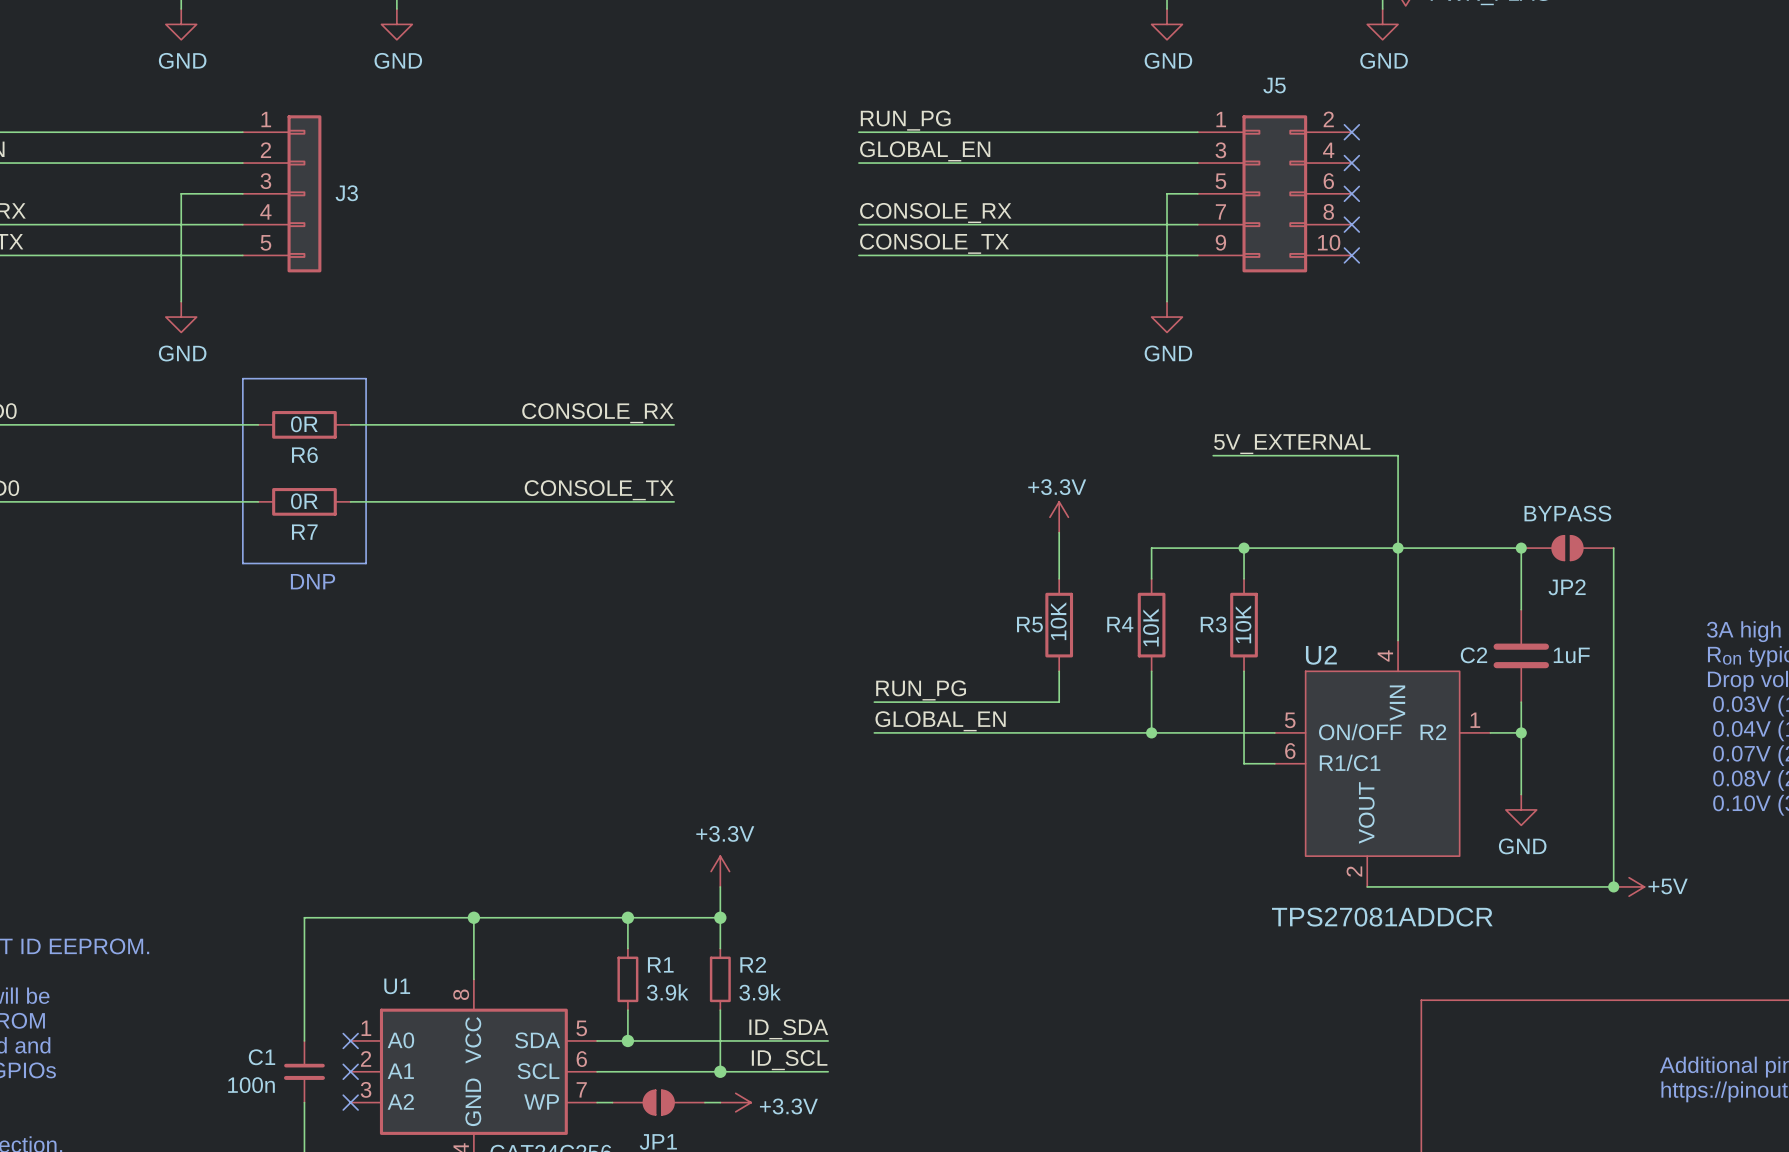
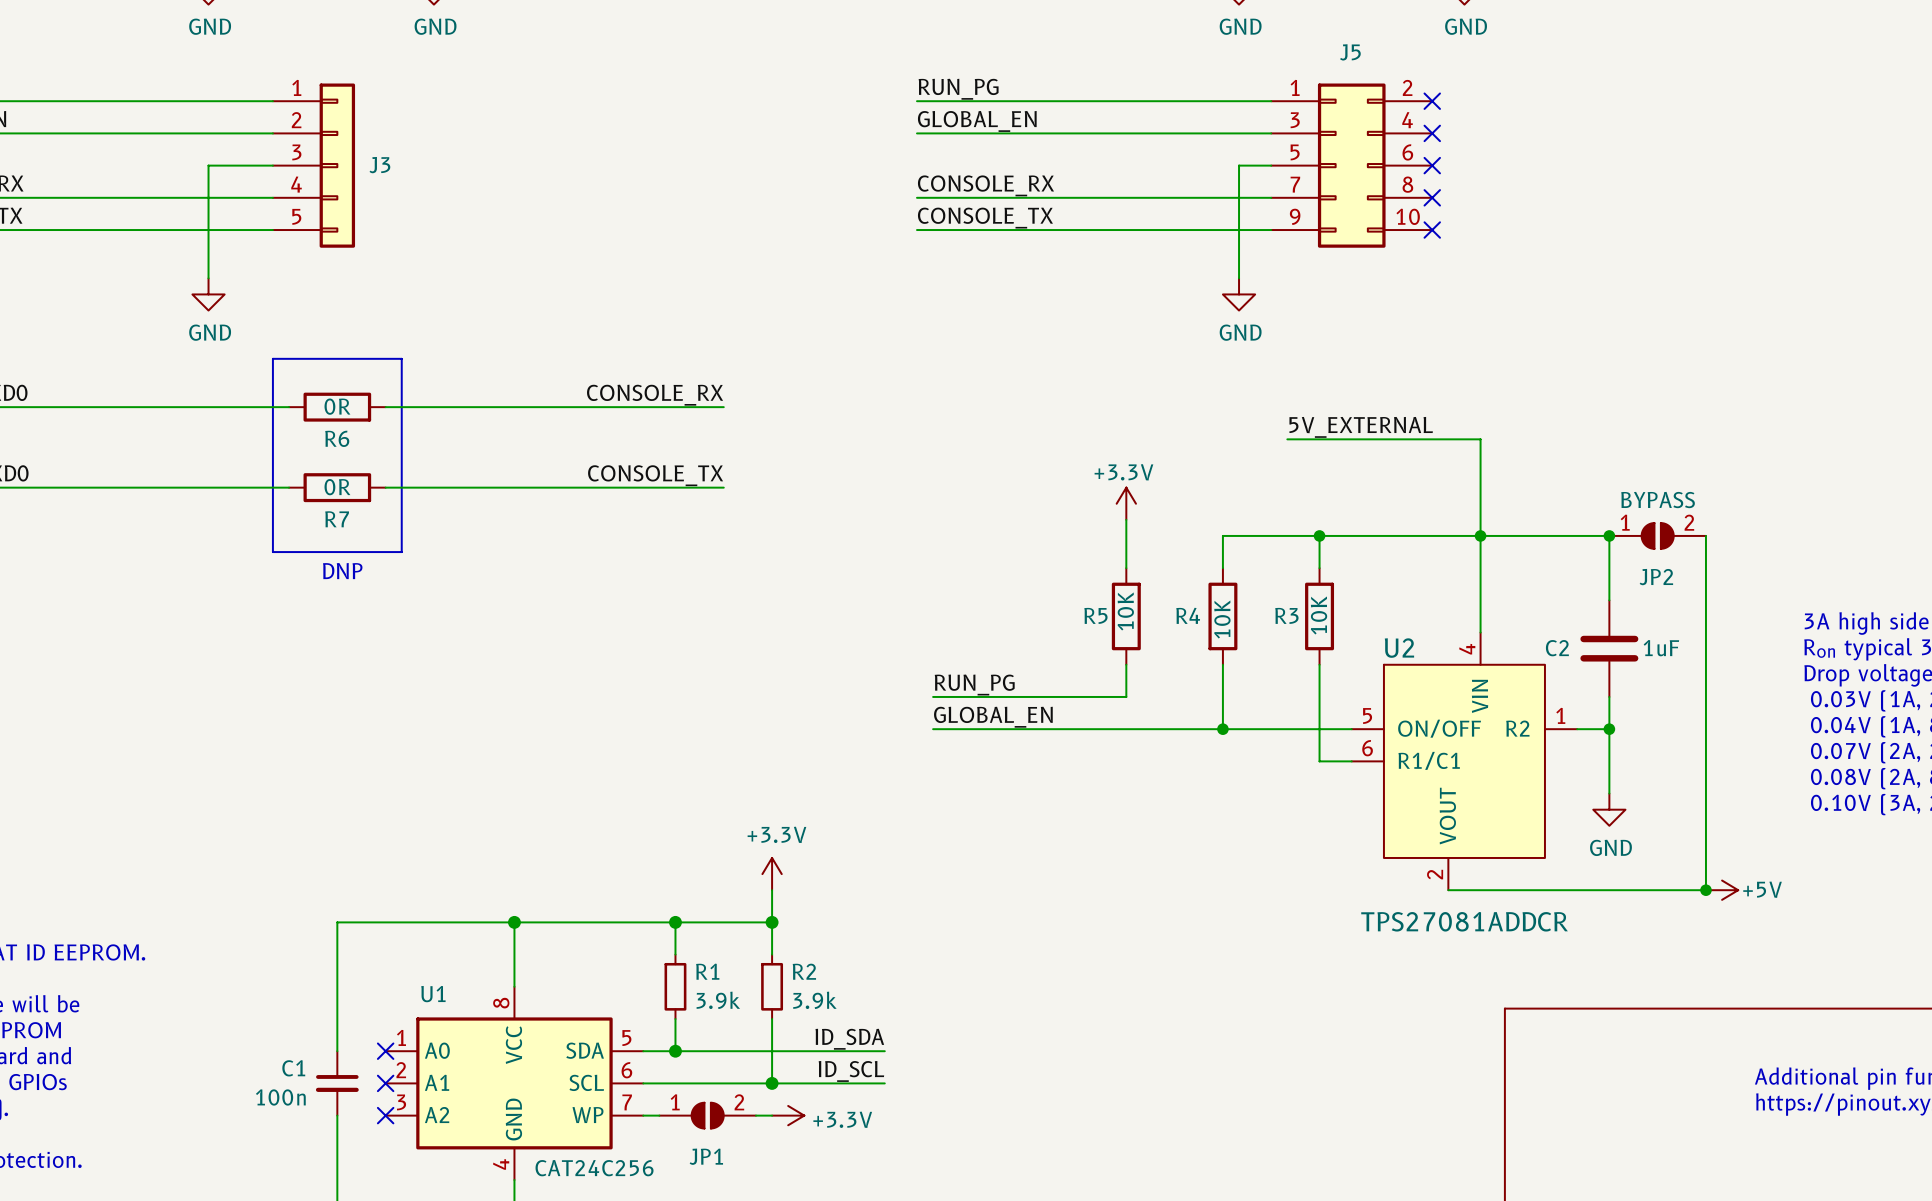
JP2 pin number: none -> 1 (1625, 522)
JP2 pin number: none -> 2 (1689, 522)
JP1 pin number: none -> 1 (675, 1102)
JP1 pin number: none -> 2 (739, 1102)

